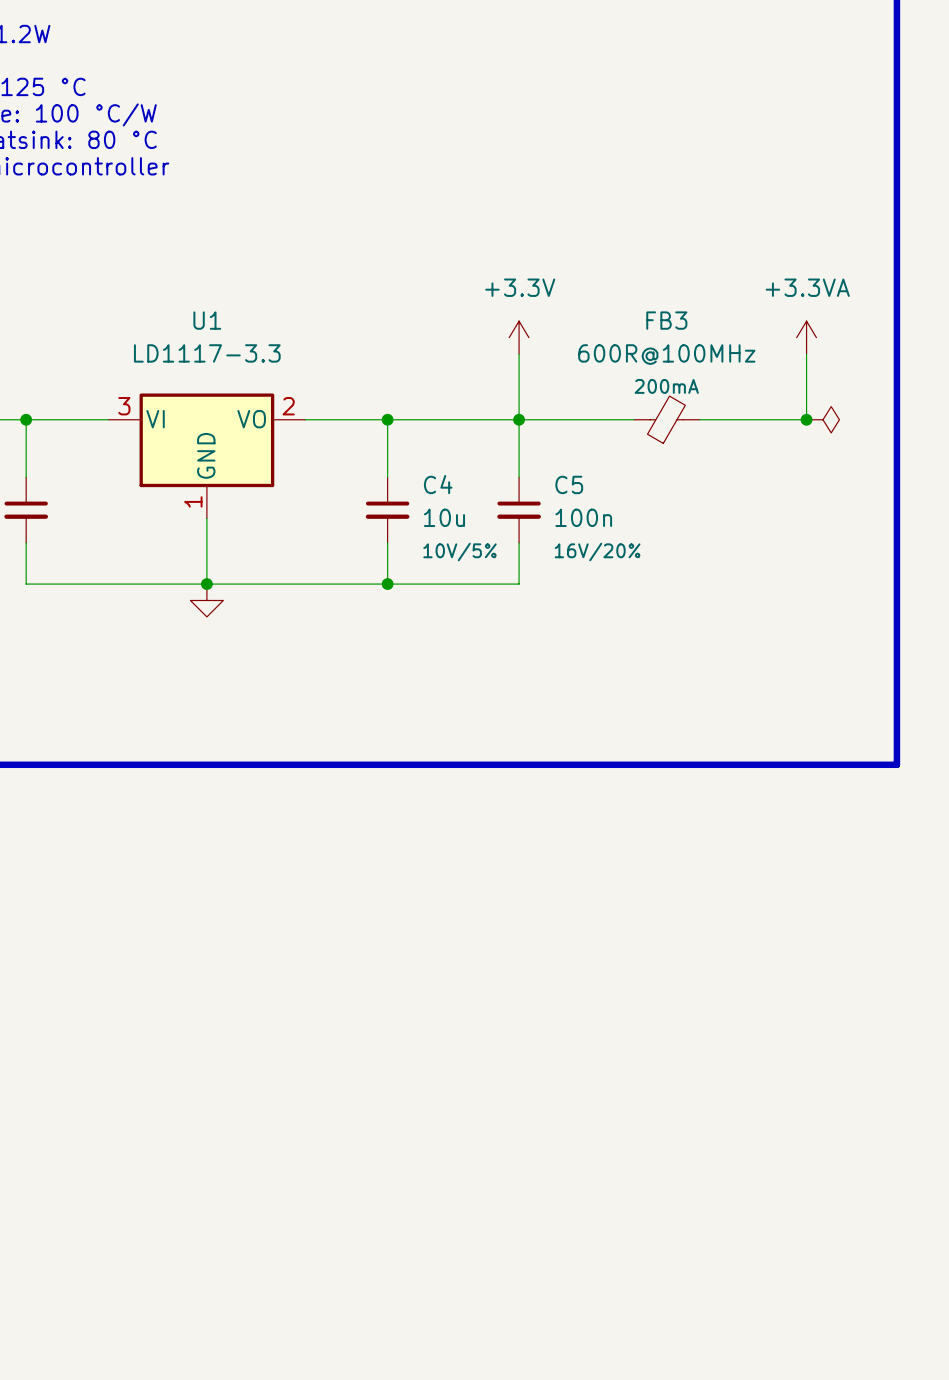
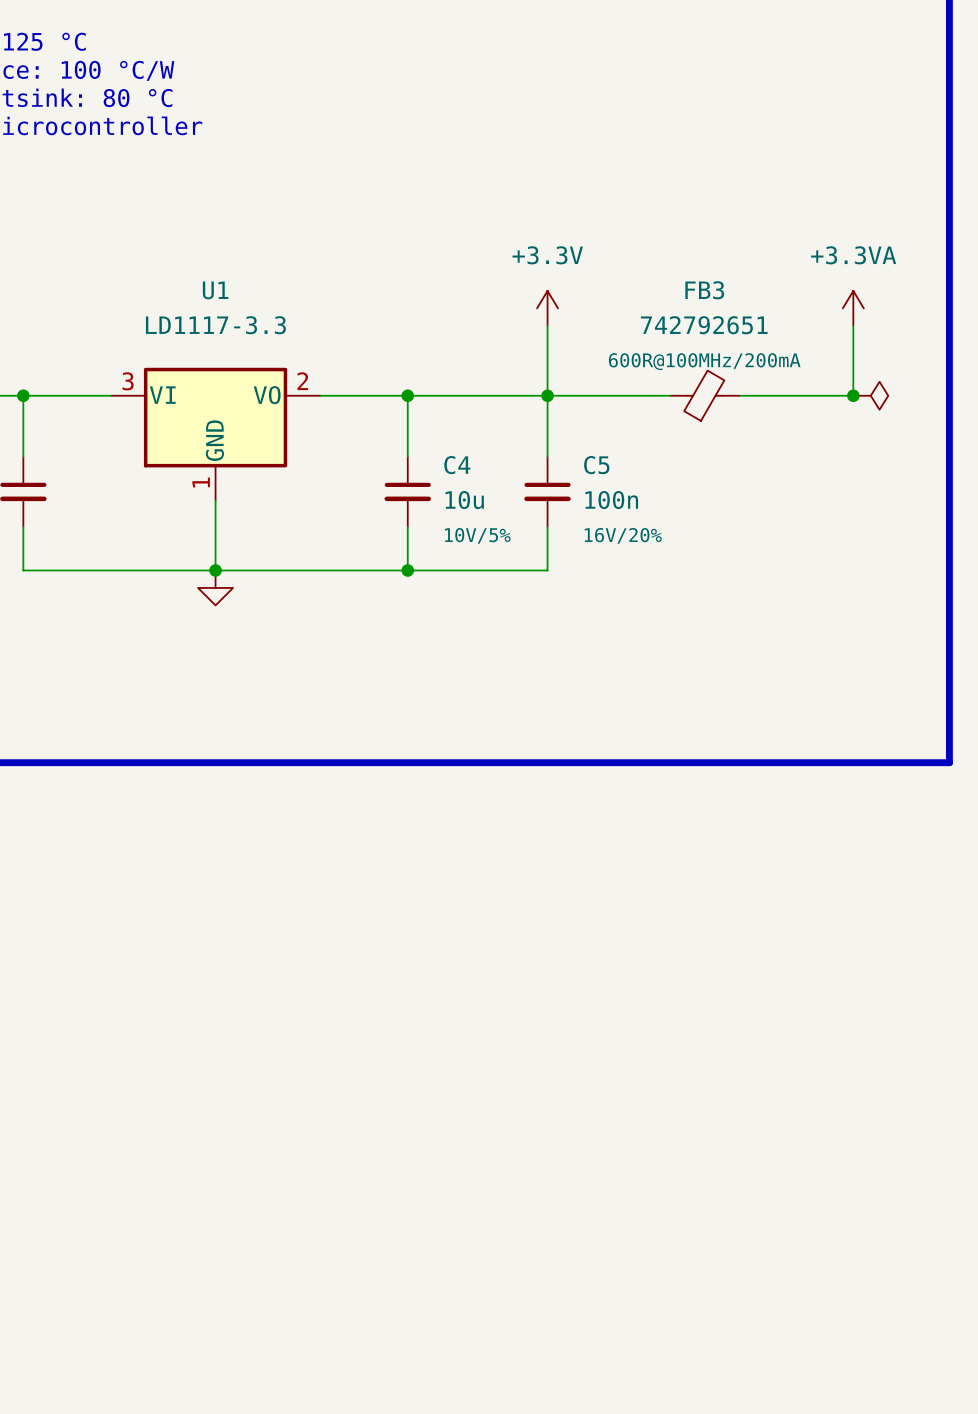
FB3 value: 600R@100MHz (666, 354) -> 742792651 (704, 325)
FB3 text: 200mA (666, 386) -> 600R@100MHz/200mA (704, 361)

